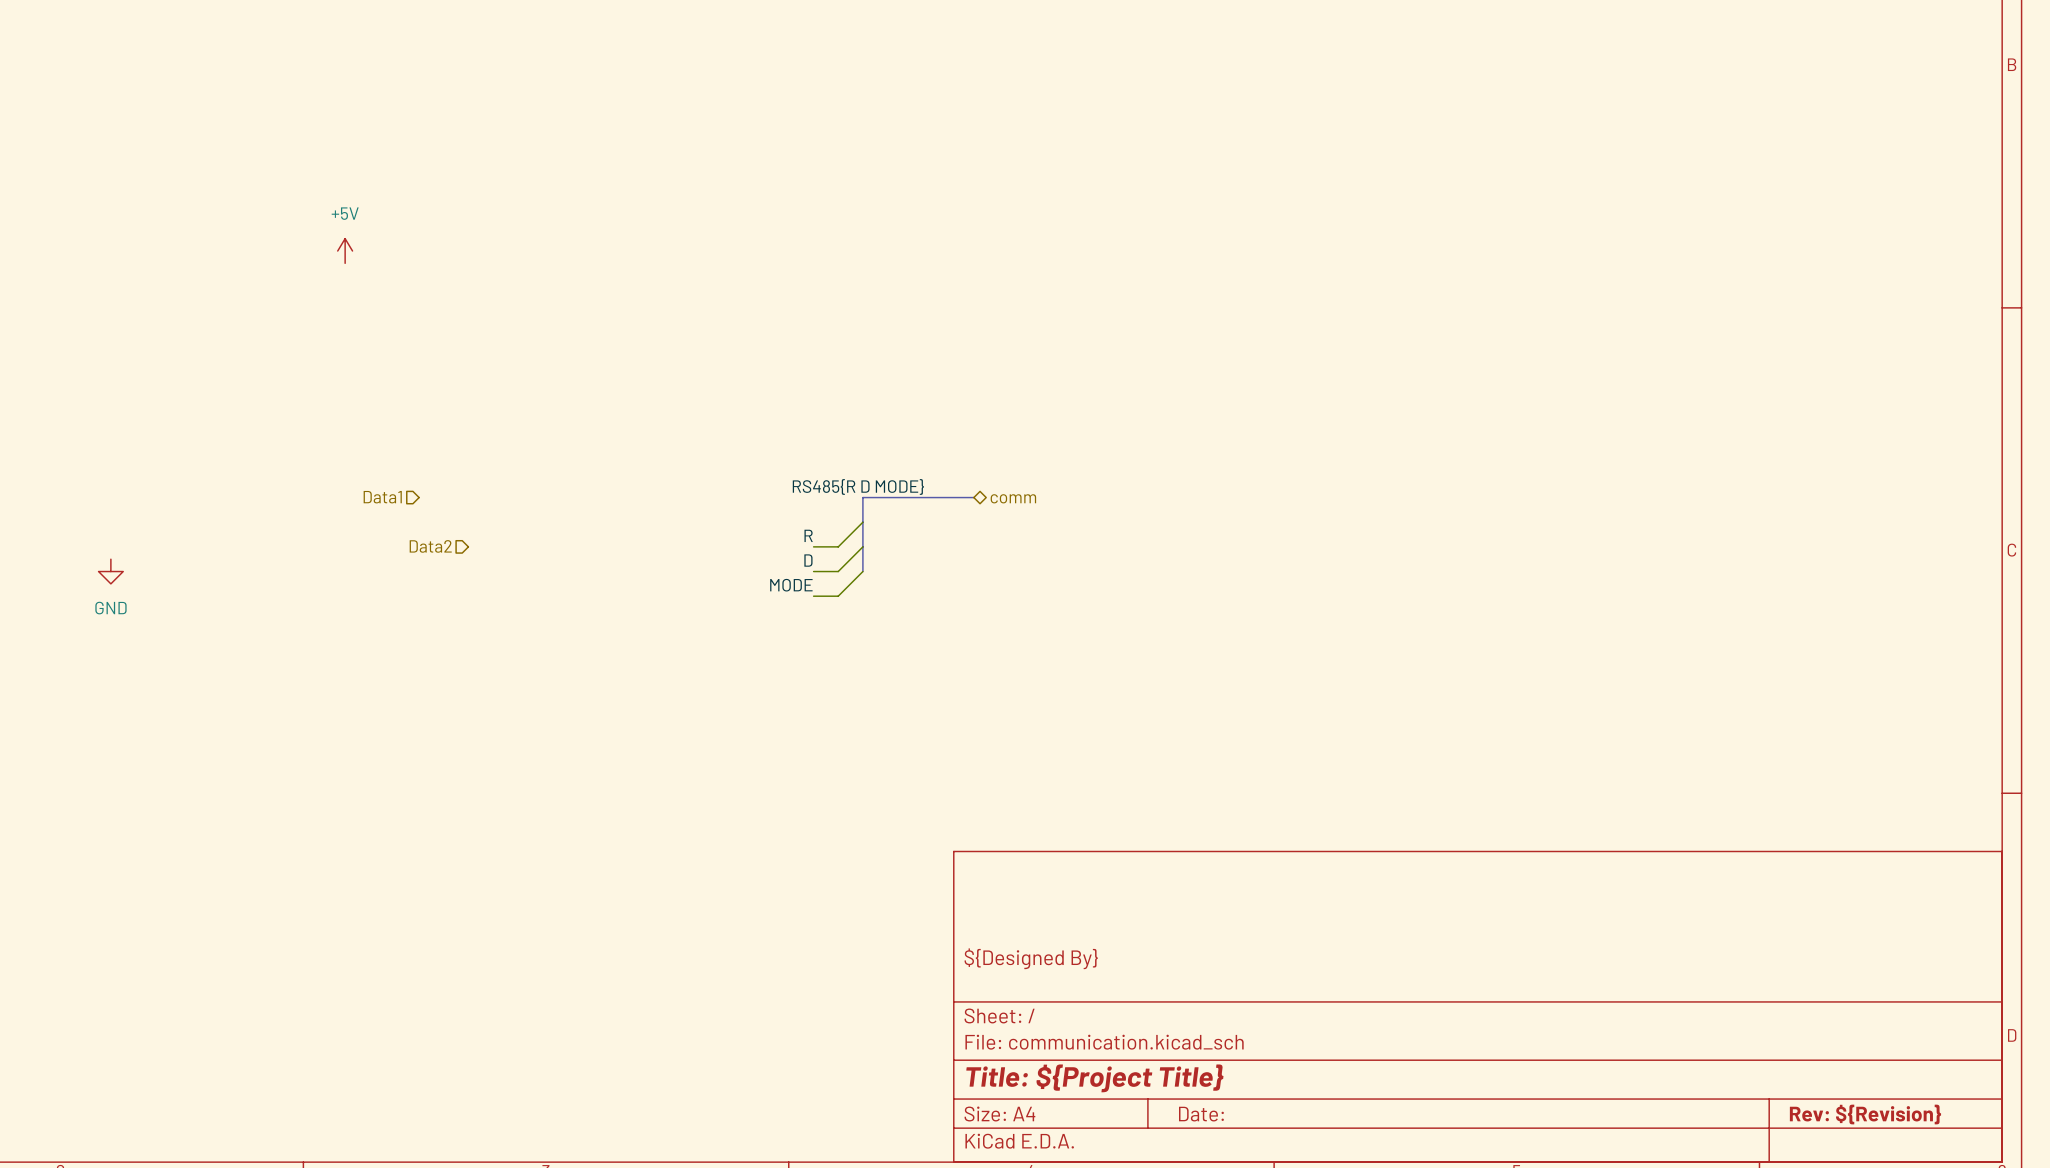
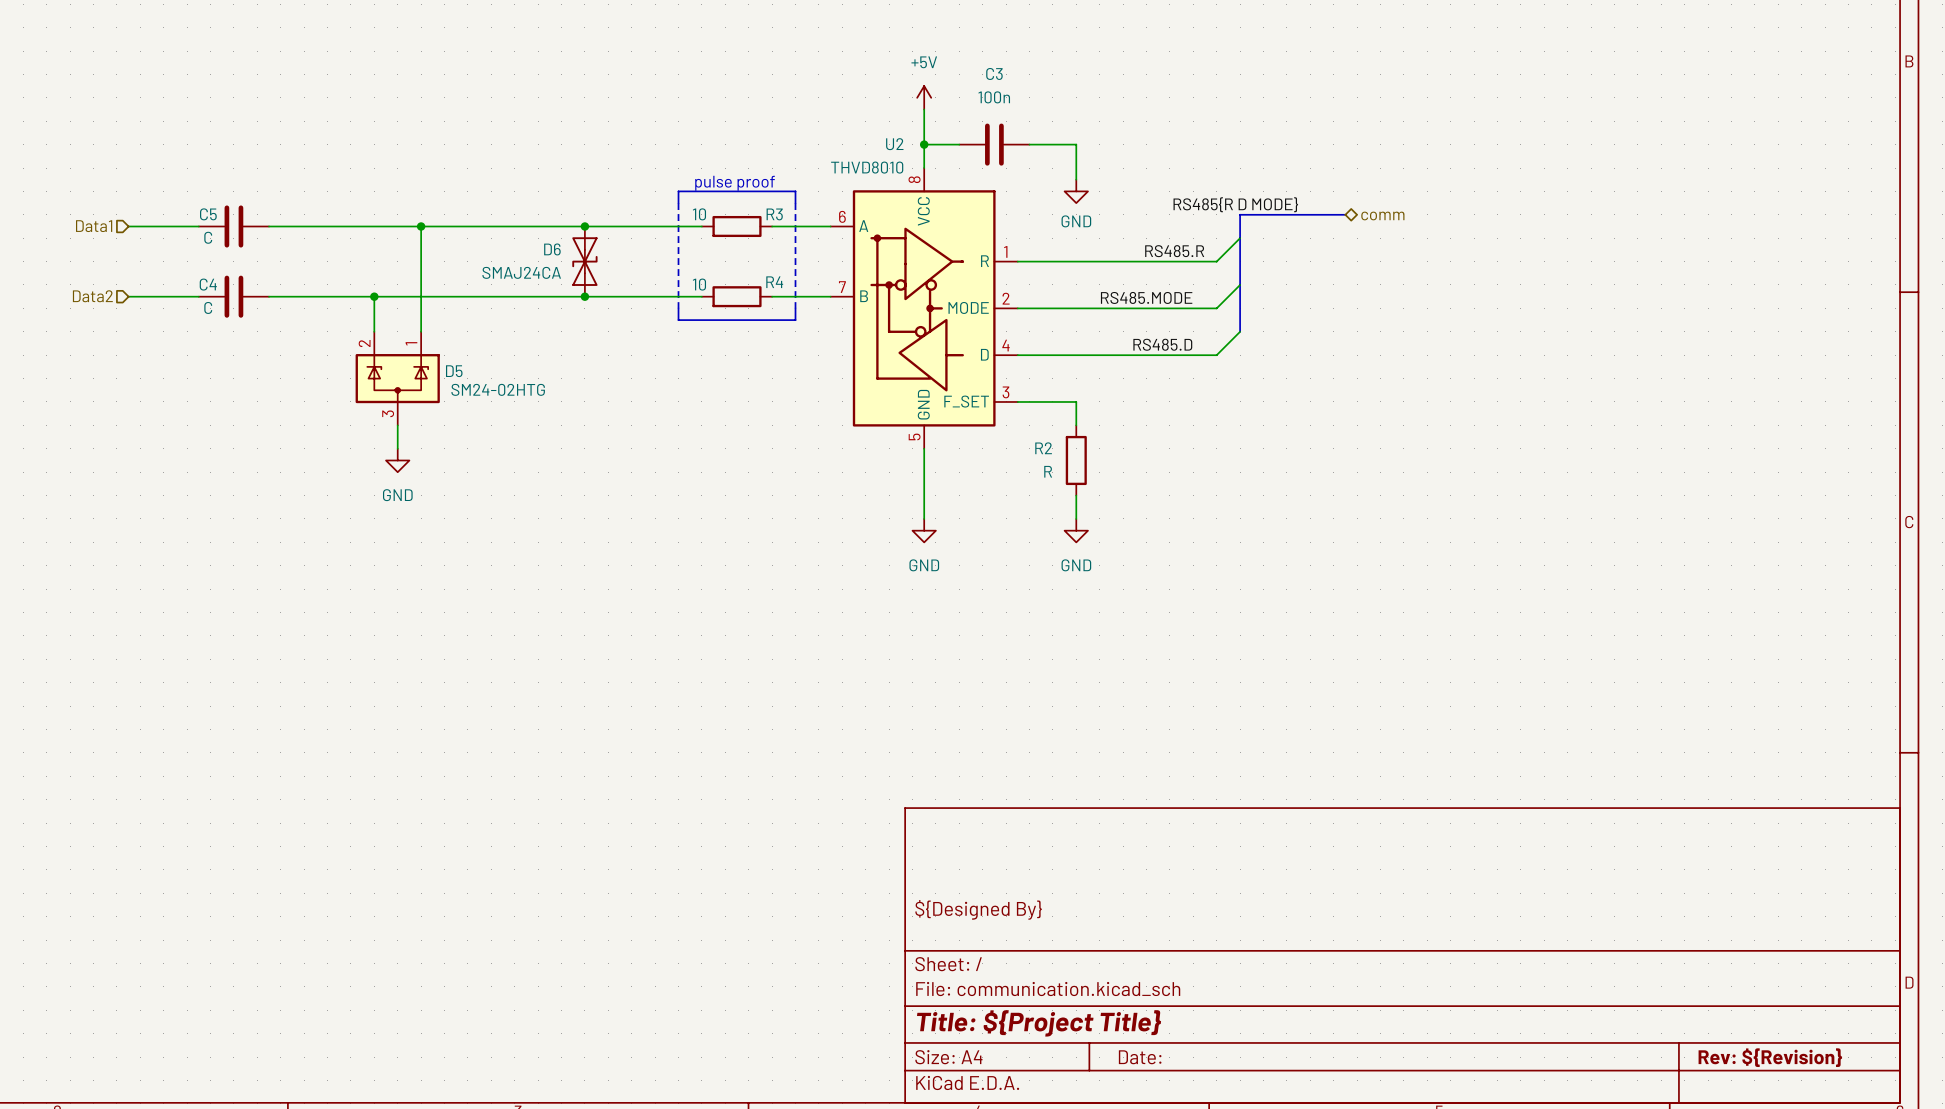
power symbol: none -> +5V (924, 97)
wire: none -> (924, 109) (924, 168)
wire: none -> (924, 144) (959, 144)
junction: none -> (924, 144)
C3: none -> 100n (994, 144)
wire: none -> (1029, 144) (1076, 144) (1076, 179)
text: none -> pulse proof (735, 183)
line: none -> (678, 191) (678, 320) (795, 320) (795, 191) (678, 191)
power symbol: none -> GND (1076, 191)
label: none -> RS485{R D MODE} (1235, 204)
bus: none -> (1345, 214) (1240, 214) (1240, 331)
hierarchical label: none -> comm (1382, 215)
hierarchical label: none -> Data1 (94, 226)
wire: none -> (128, 226) (198, 226)
C5: none -> C (233, 226)
wire: none -> (269, 226) (701, 226)
wire: none -> (421, 226) (421, 331)
junction: none -> (421, 226)
junction: none -> (584, 226)
R3: none -> 10 (737, 226)
wire: none -> (772, 226) (830, 226)
power symbol: +5V (345, 251) -> none
wire: none -> (1240, 238) (1216, 261) (1017, 261)
label: none -> RS485.R (1174, 251)
D6: none -> SMAJ24CA (584, 261)
wire: none -> (1240, 284) (1216, 308) (1017, 308)
hierarchical label: none -> Data2 (92, 296)
wire: none -> (128, 296) (198, 296)
C4: none -> C (233, 296)
wire: none -> (269, 296) (701, 296)
wire: none -> (374, 296) (374, 331)
junction: none -> (374, 296)
junction: none -> (584, 296)
R4: none -> 10 (737, 296)
wire: none -> (772, 296) (830, 296)
label: none -> RS485.MODE (1146, 297)
U2: none -> THVD8010 (924, 308)
wire: none -> (1240, 331) (1216, 355) (1017, 355)
label: none -> RS485.D (1162, 344)
D5: none -> SM24-02HTG (397, 378)
wire: none -> (1017, 401) (1076, 401) (1076, 425)
wire: none -> (397, 425) (397, 448)
wire: none -> (924, 448) (924, 518)
power symbol: none -> GND (397, 460)
R2: none -> R (1076, 460)
label: RS485{R D MODE} (858, 486) -> none
hierarchical label: Data1 (382, 497) -> none
bus: (973, 497) (862, 497) (862, 571) -> none
hierarchical label: comm (1013, 498) -> none
wire: (862, 522) (838, 546) (813, 546) -> none
wire: none -> (1076, 495) (1076, 518)
label: R (808, 535) -> none
hierarchical label: Data2 (430, 546) -> none
wire: (862, 546) (838, 571) (813, 571) -> none
power symbol: none -> GND (924, 530)
power symbol: none -> GND (1076, 530)
label: D (808, 560) -> none
power symbol: GND (110, 571) -> none
wire: (862, 571) (838, 596) (813, 596) -> none
label: MODE (791, 585) -> none

